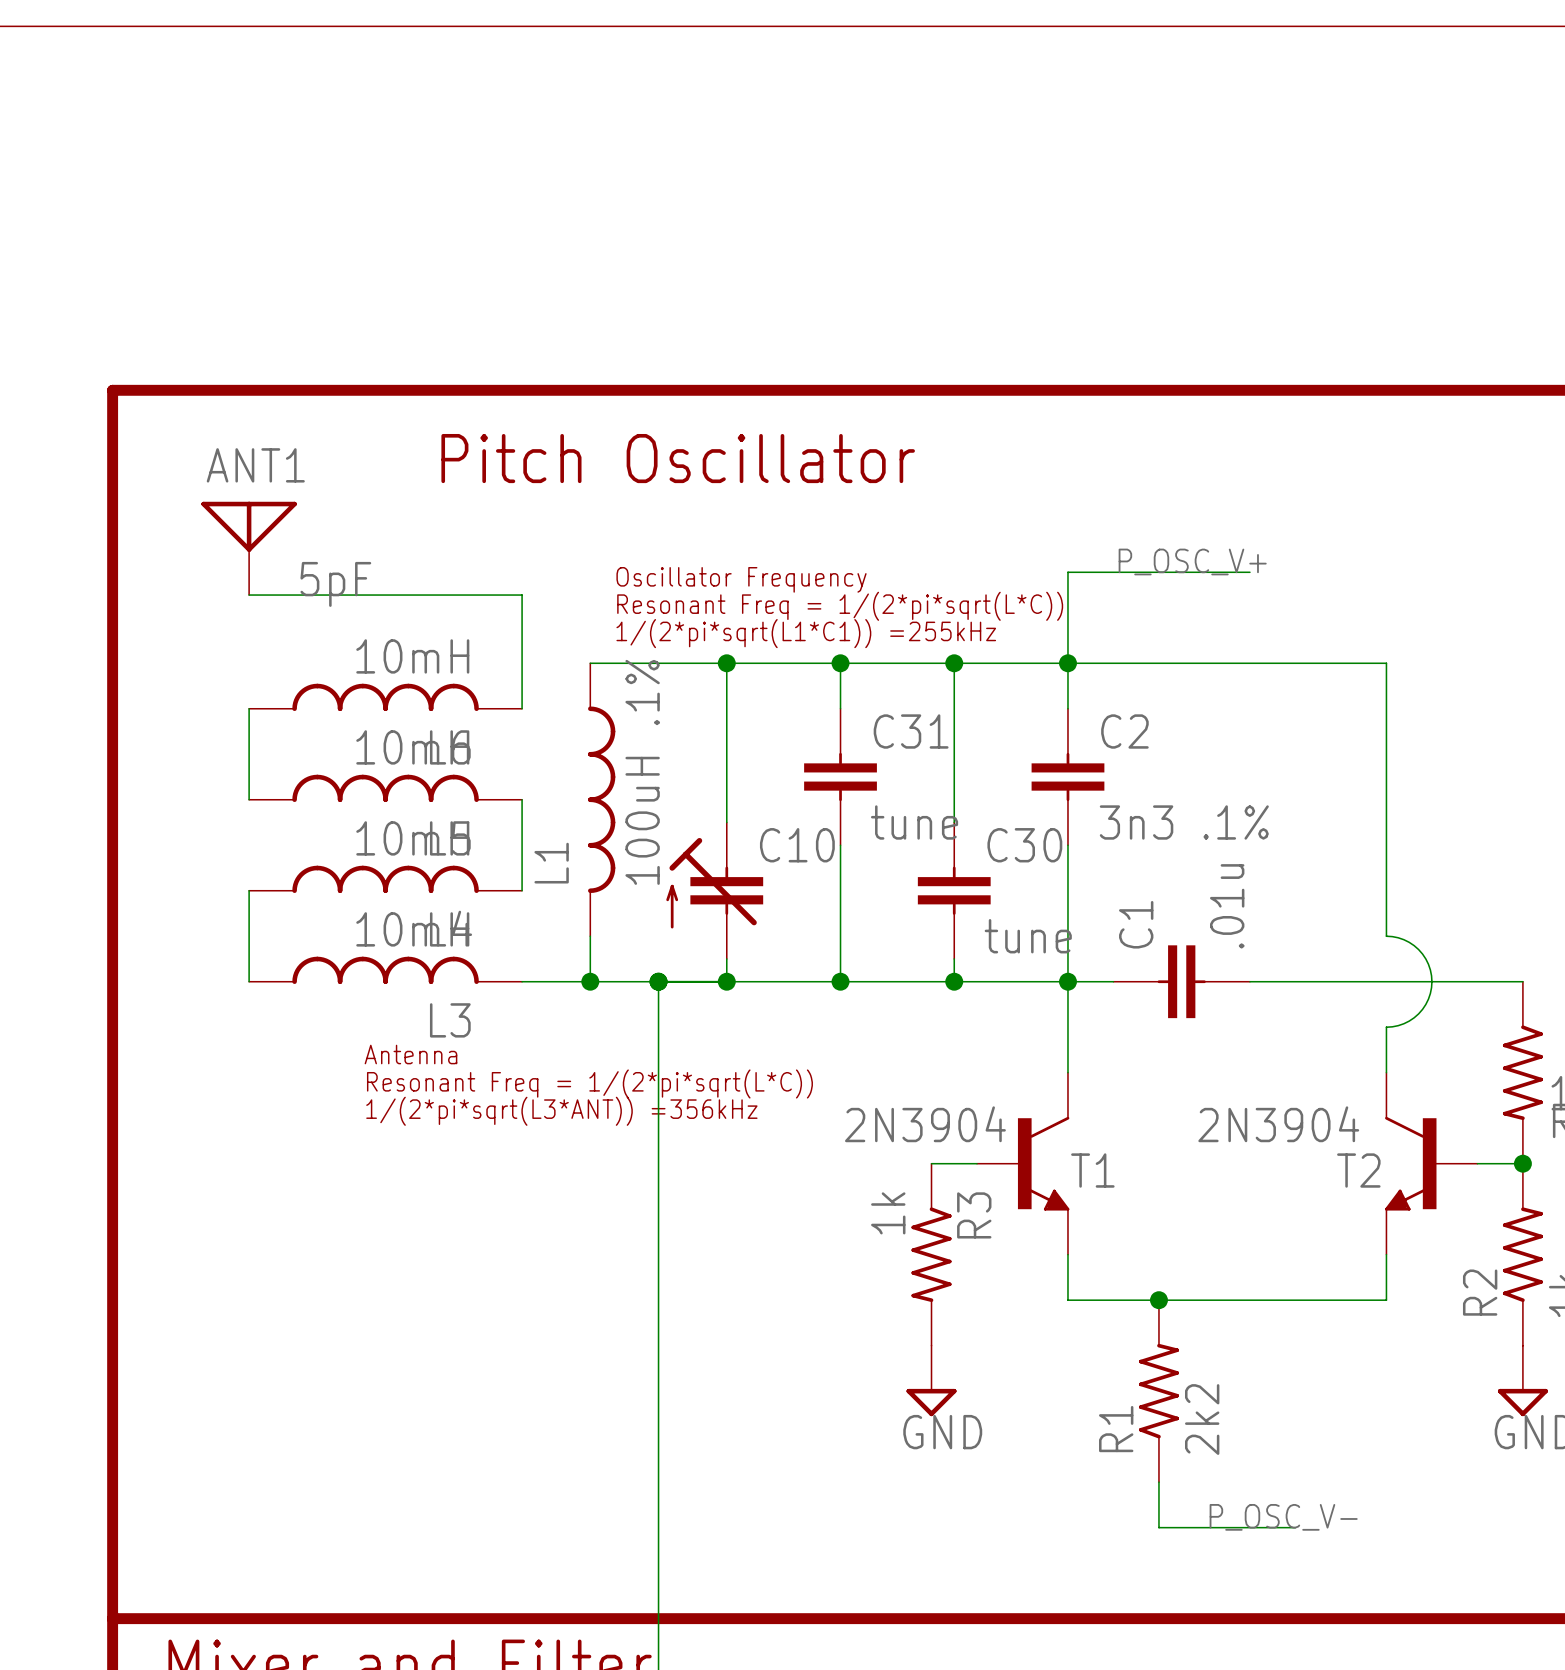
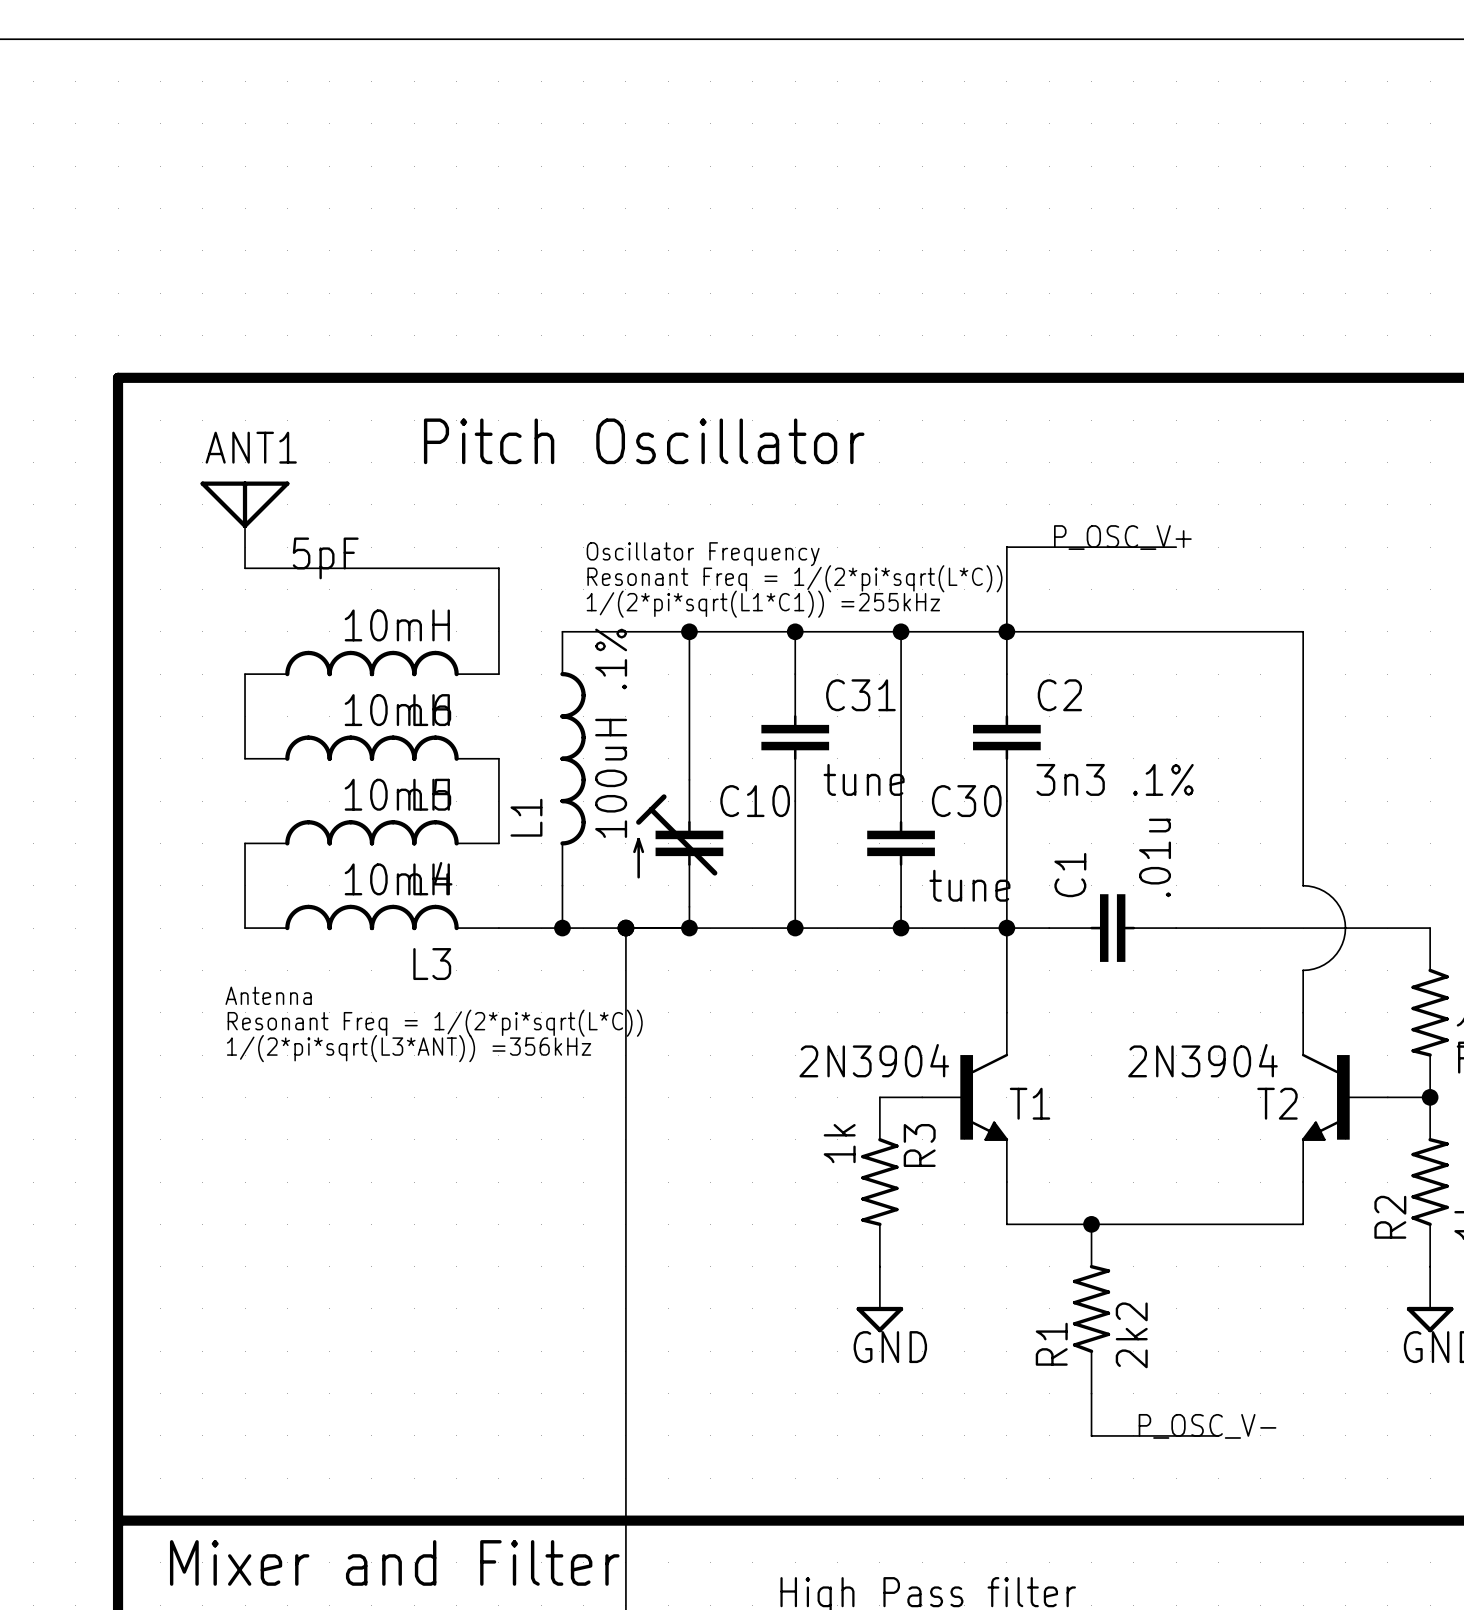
text position: Antenna (410, 1054) -> Antenna (268, 995)
text position: Resonant Freq = 1/(2*pi*sqrt(L*C)) (589, 1083) -> Resonant Freq = 1/(2*pi*sqrt(L*C)) (435, 1023)
text position: 1/(2*pi*sqrt(L3*ANT)) =356kHz (561, 1111) -> 1/(2*pi*sqrt(L3*ANT)) =356kHz (409, 1048)

